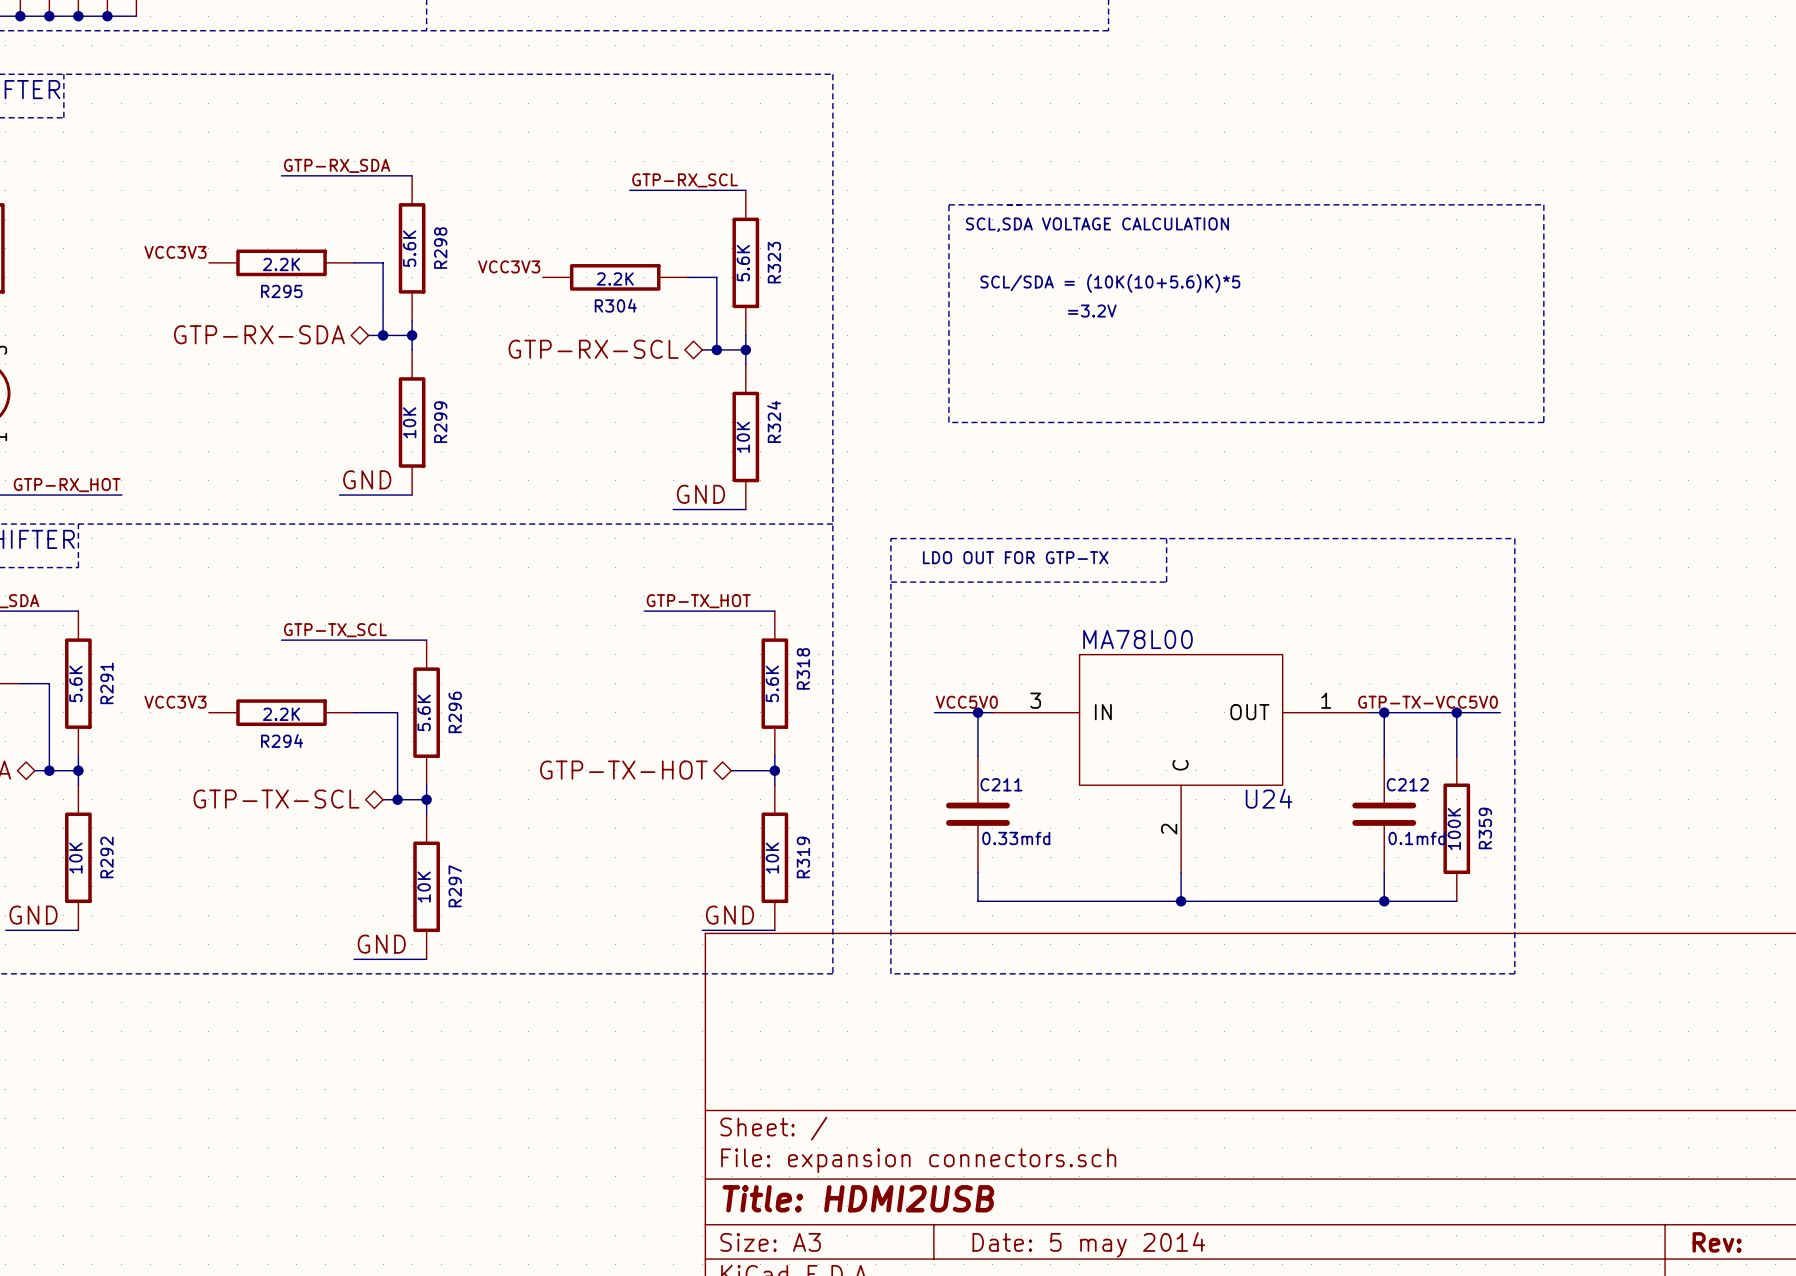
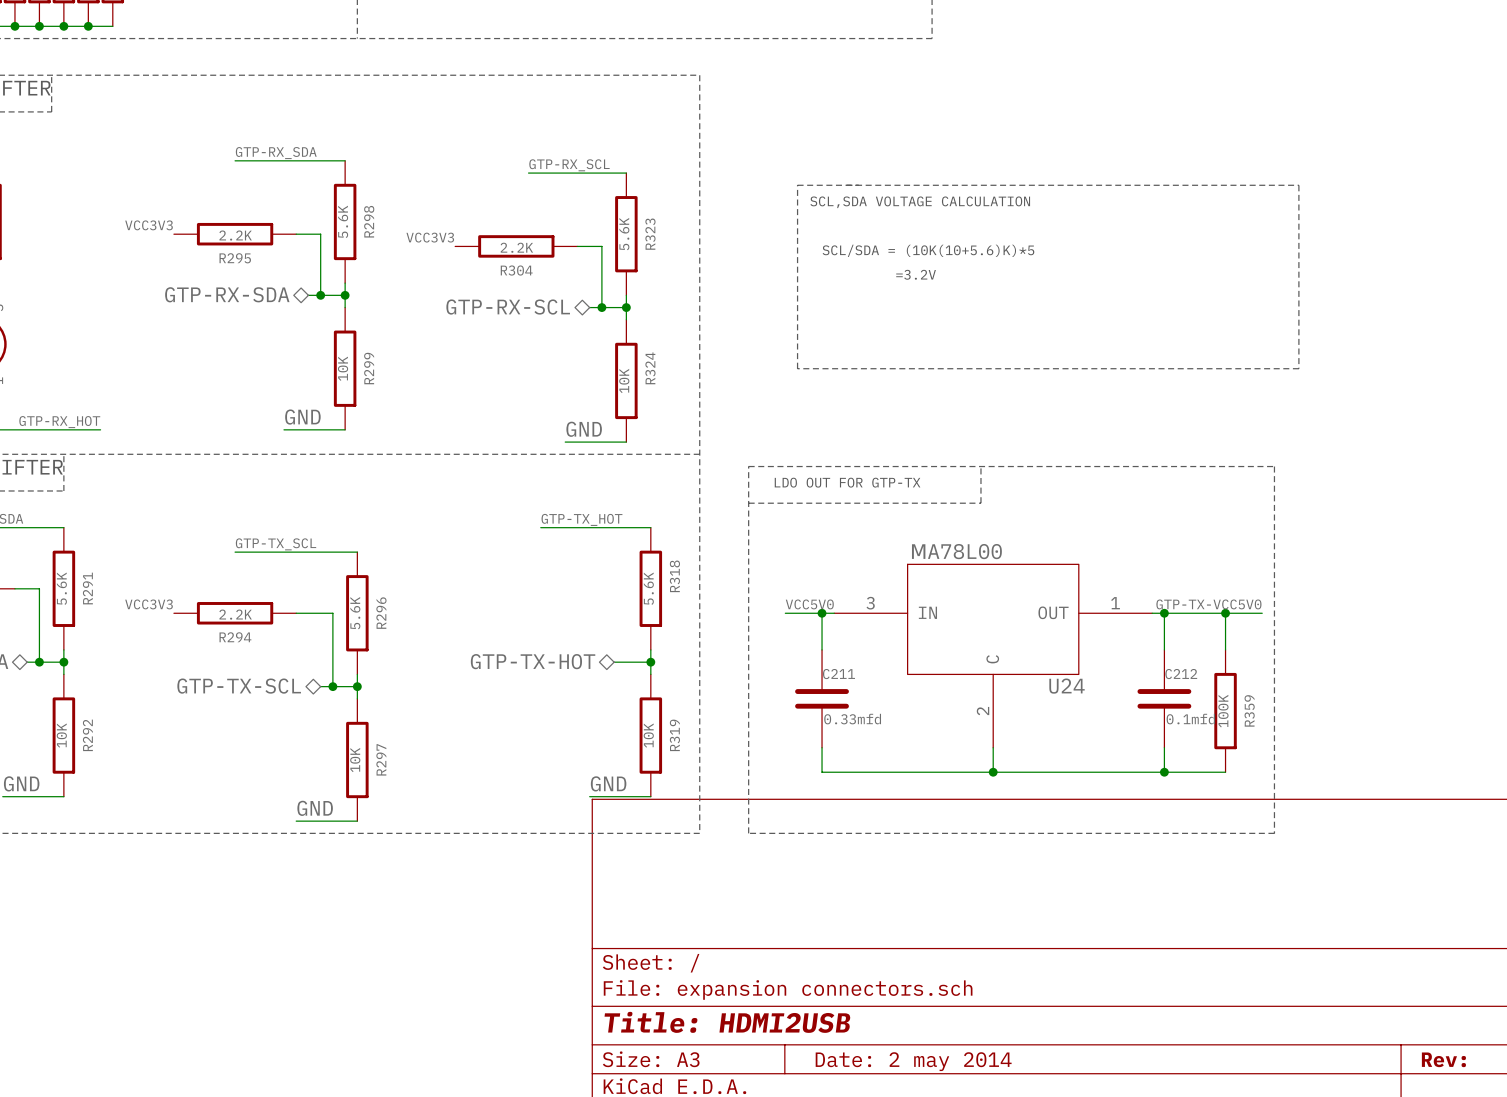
title block: Date: 5 may 2014 (1088, 1244) -> Date: 2 may 2014 (913, 1061)

